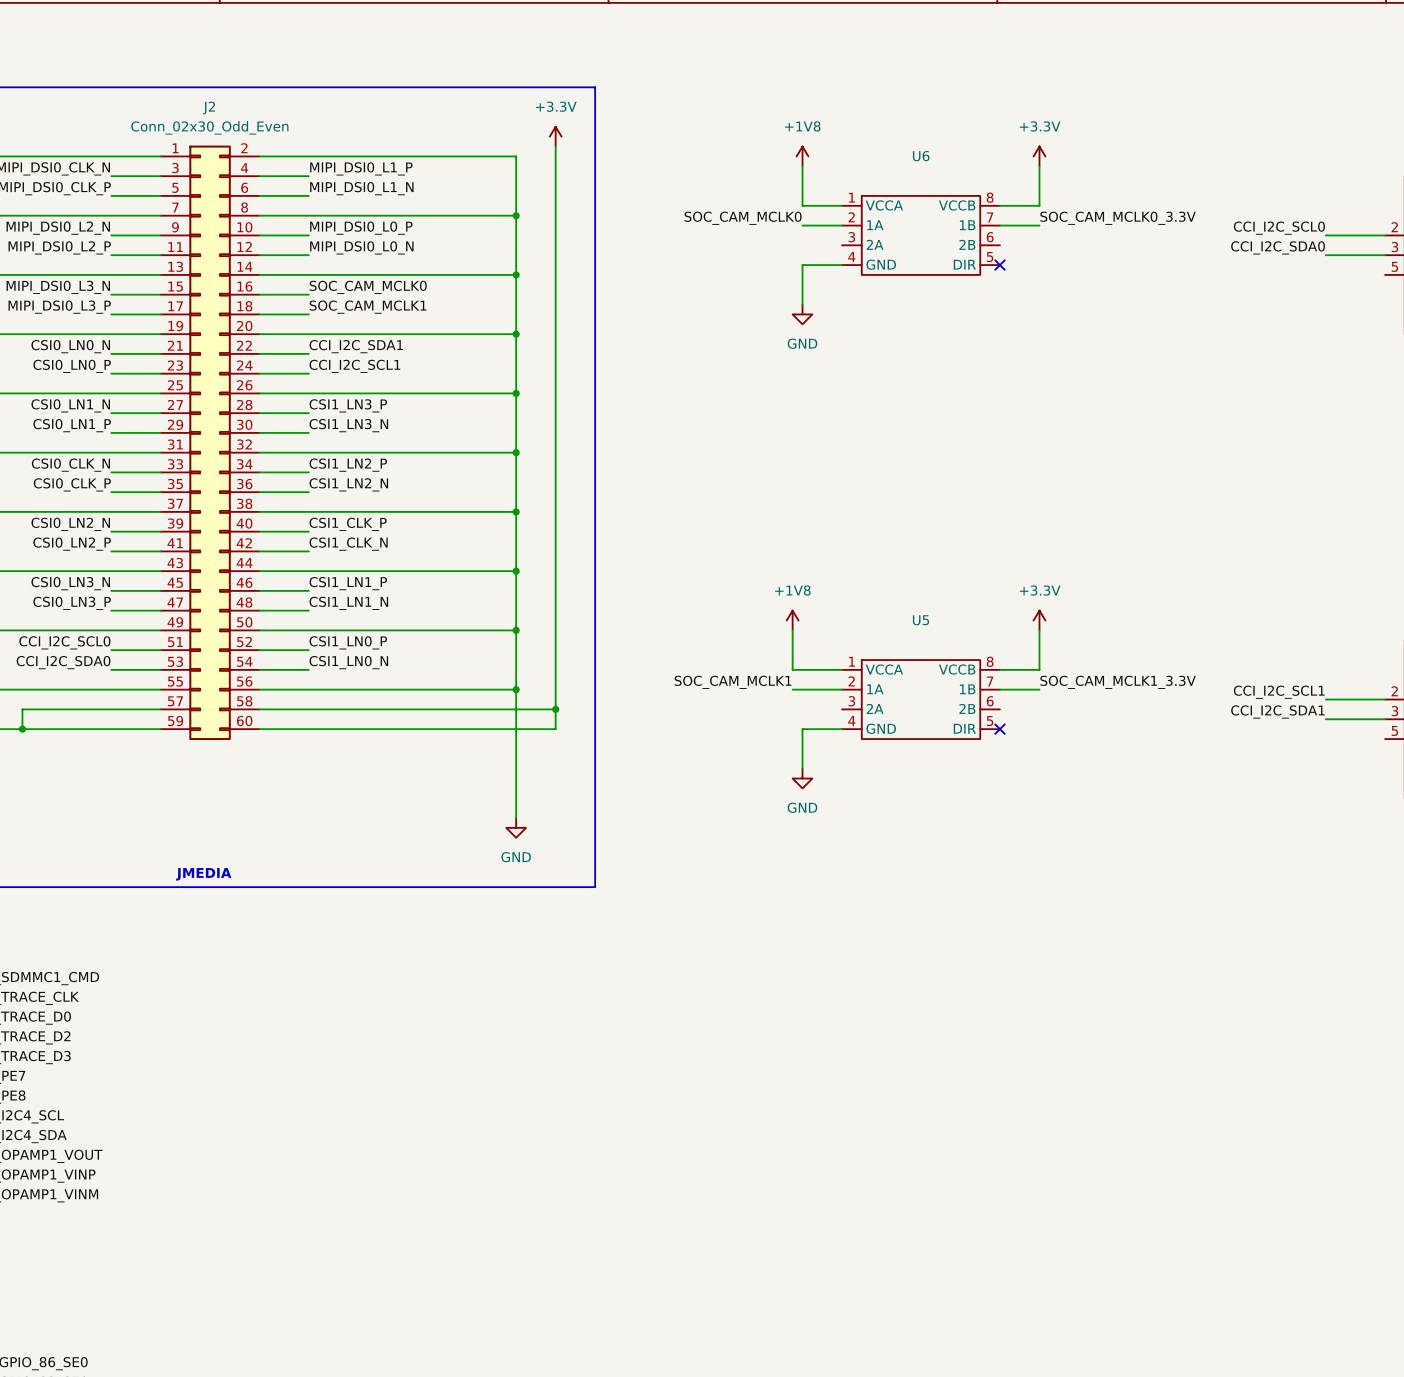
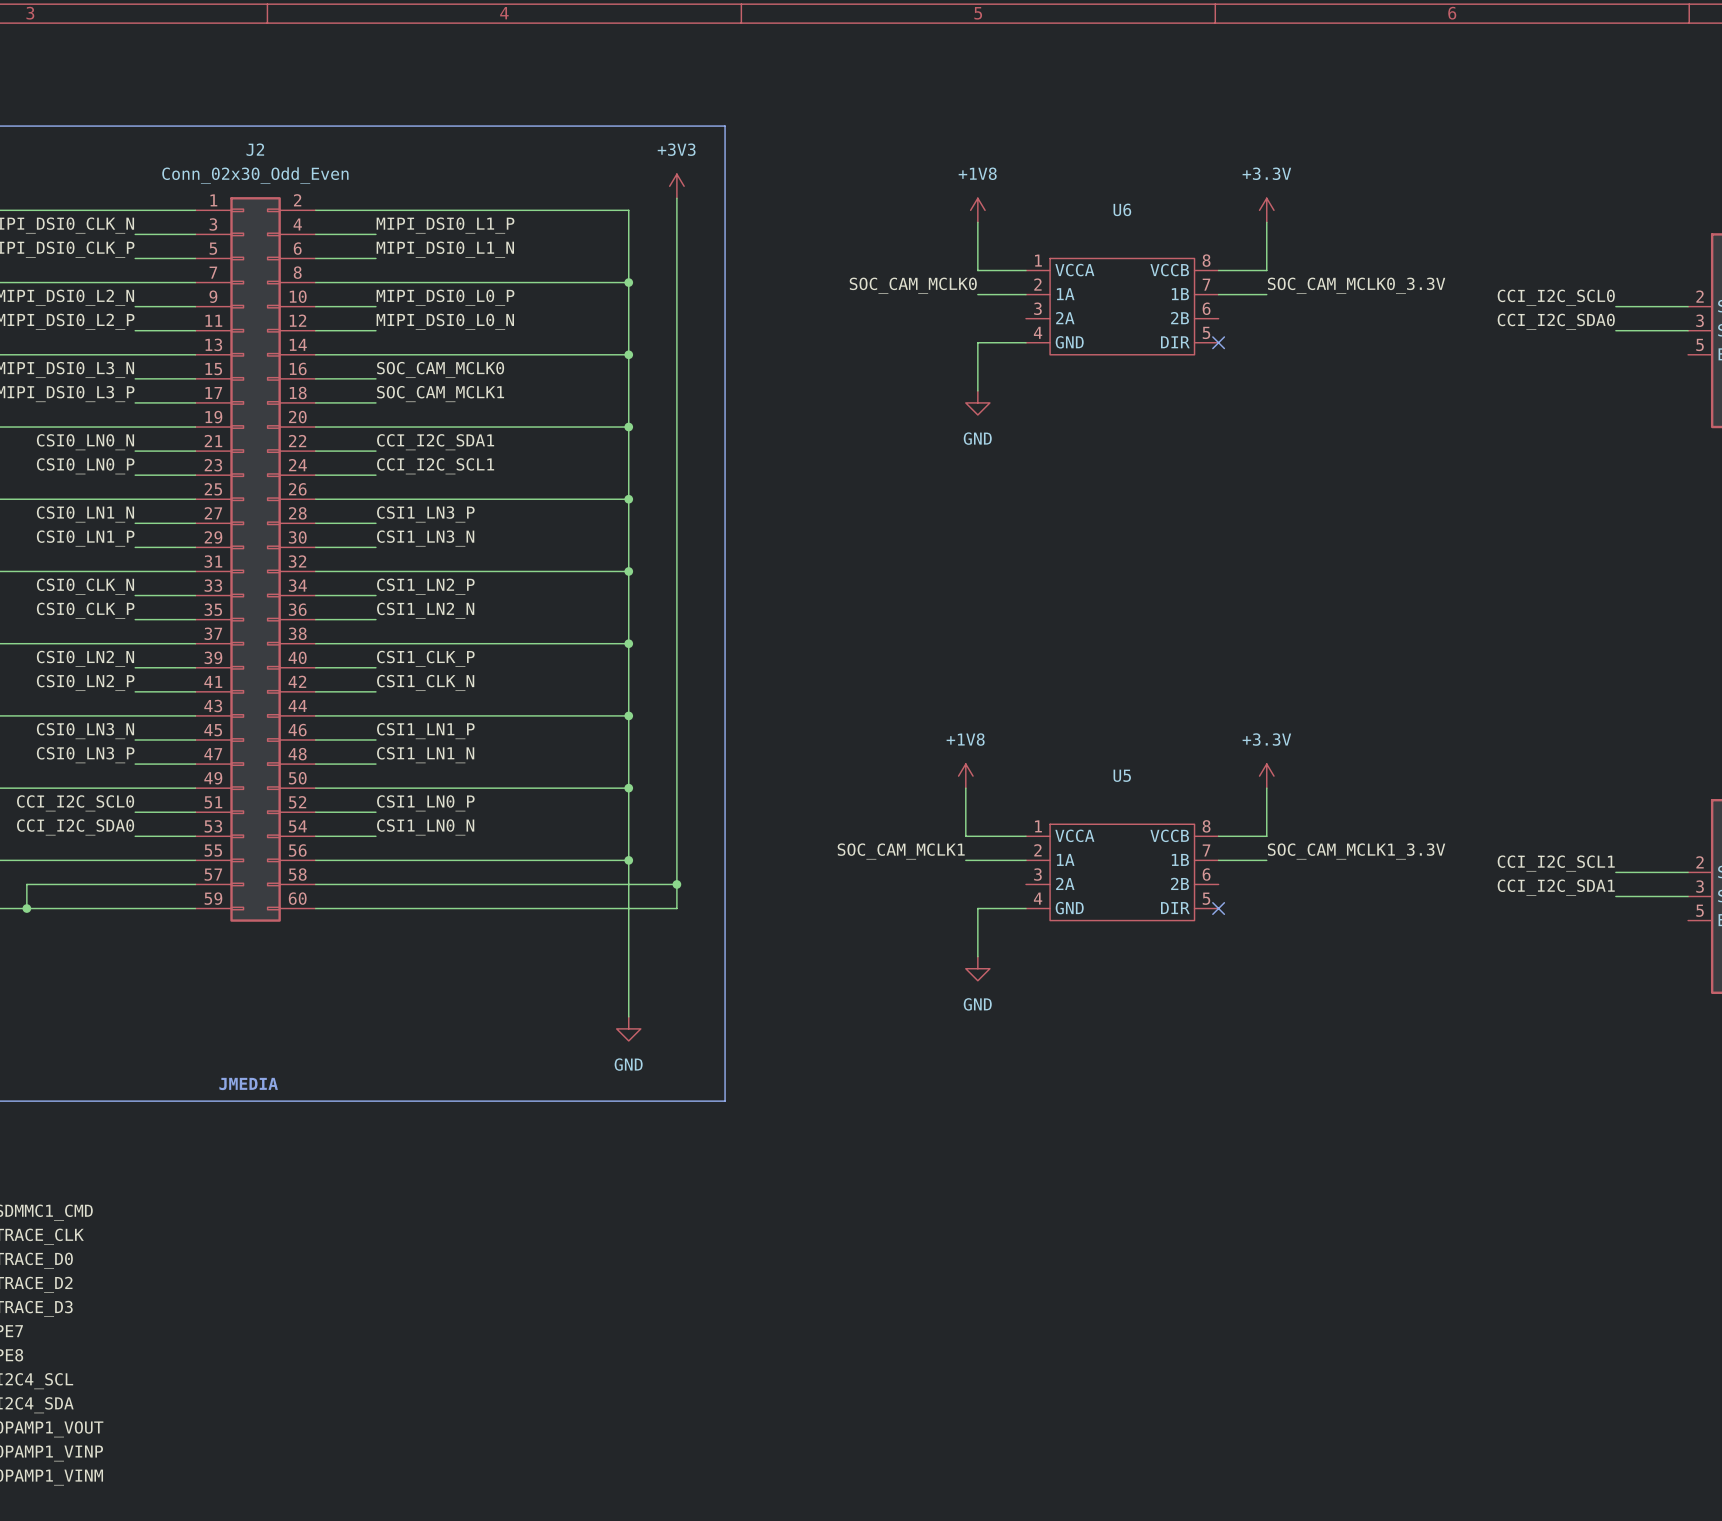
power symbol: +3.3V (555, 136) -> +3V3 (676, 186)

